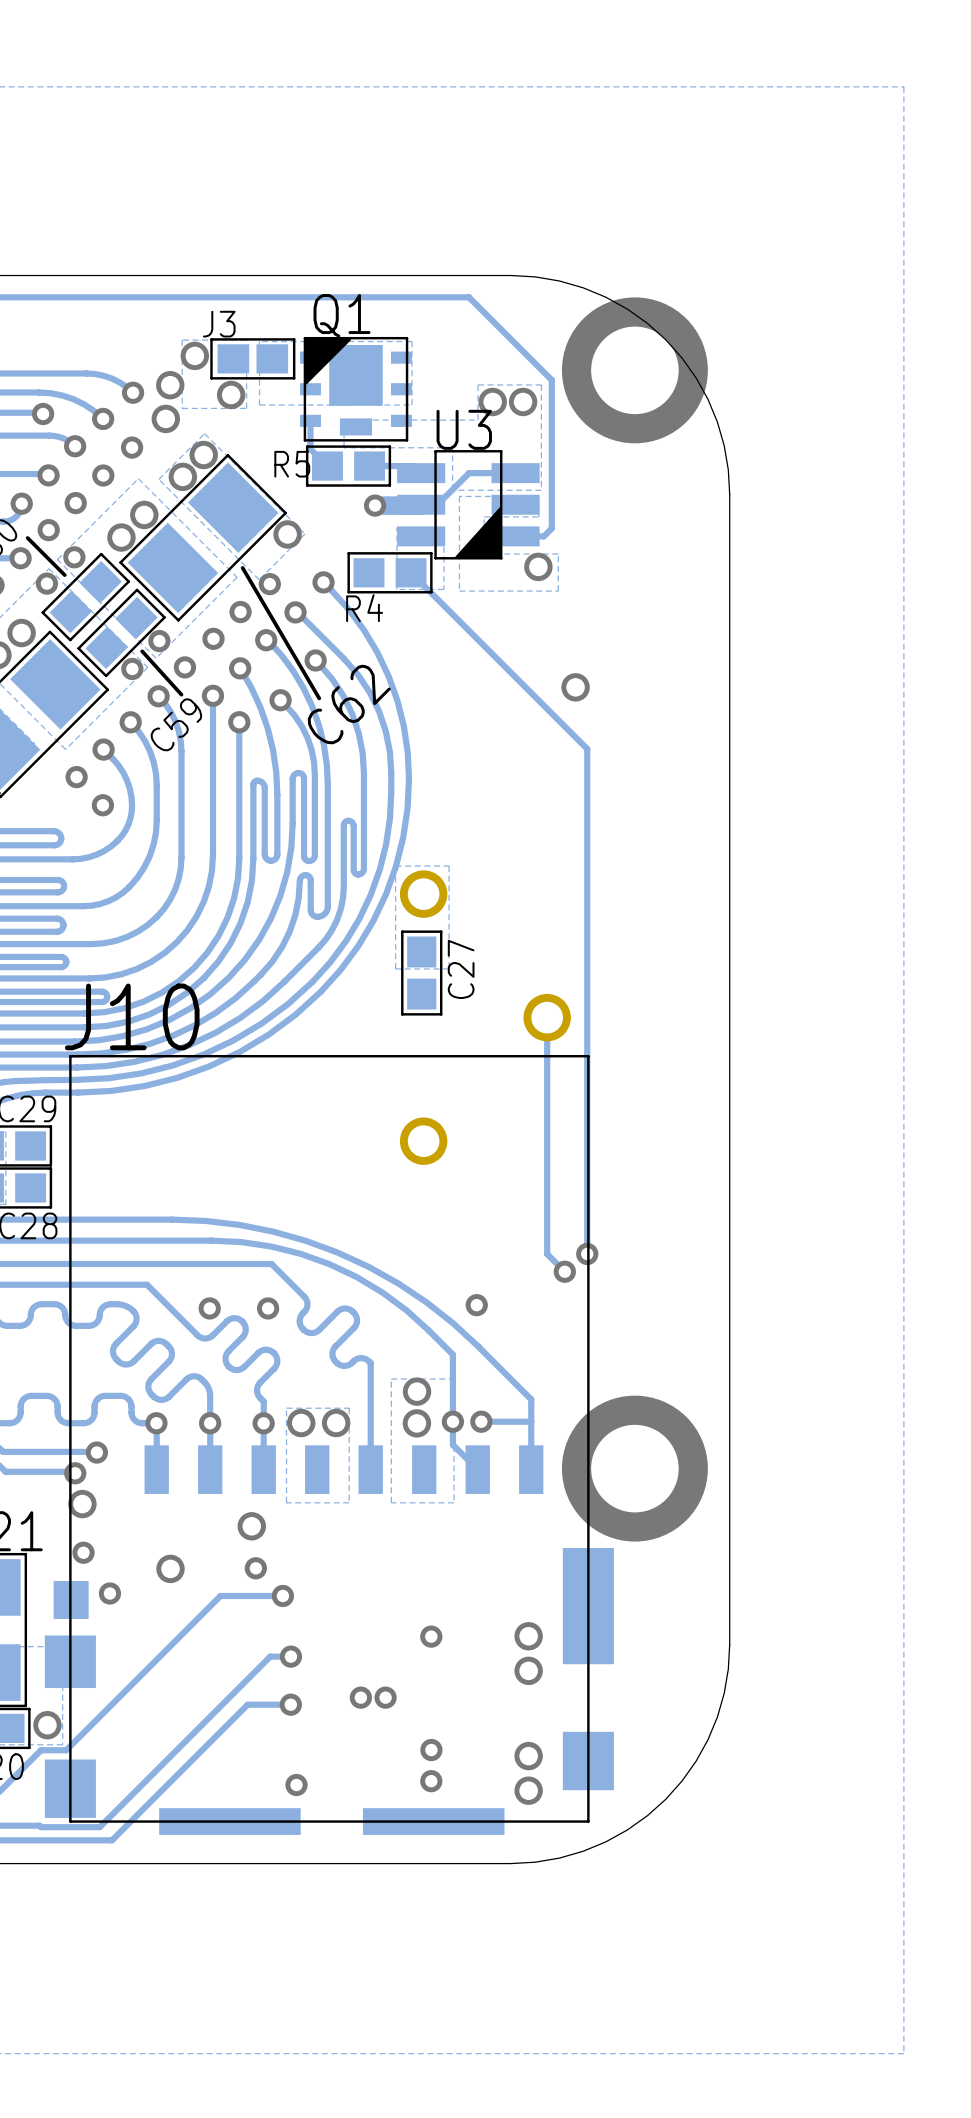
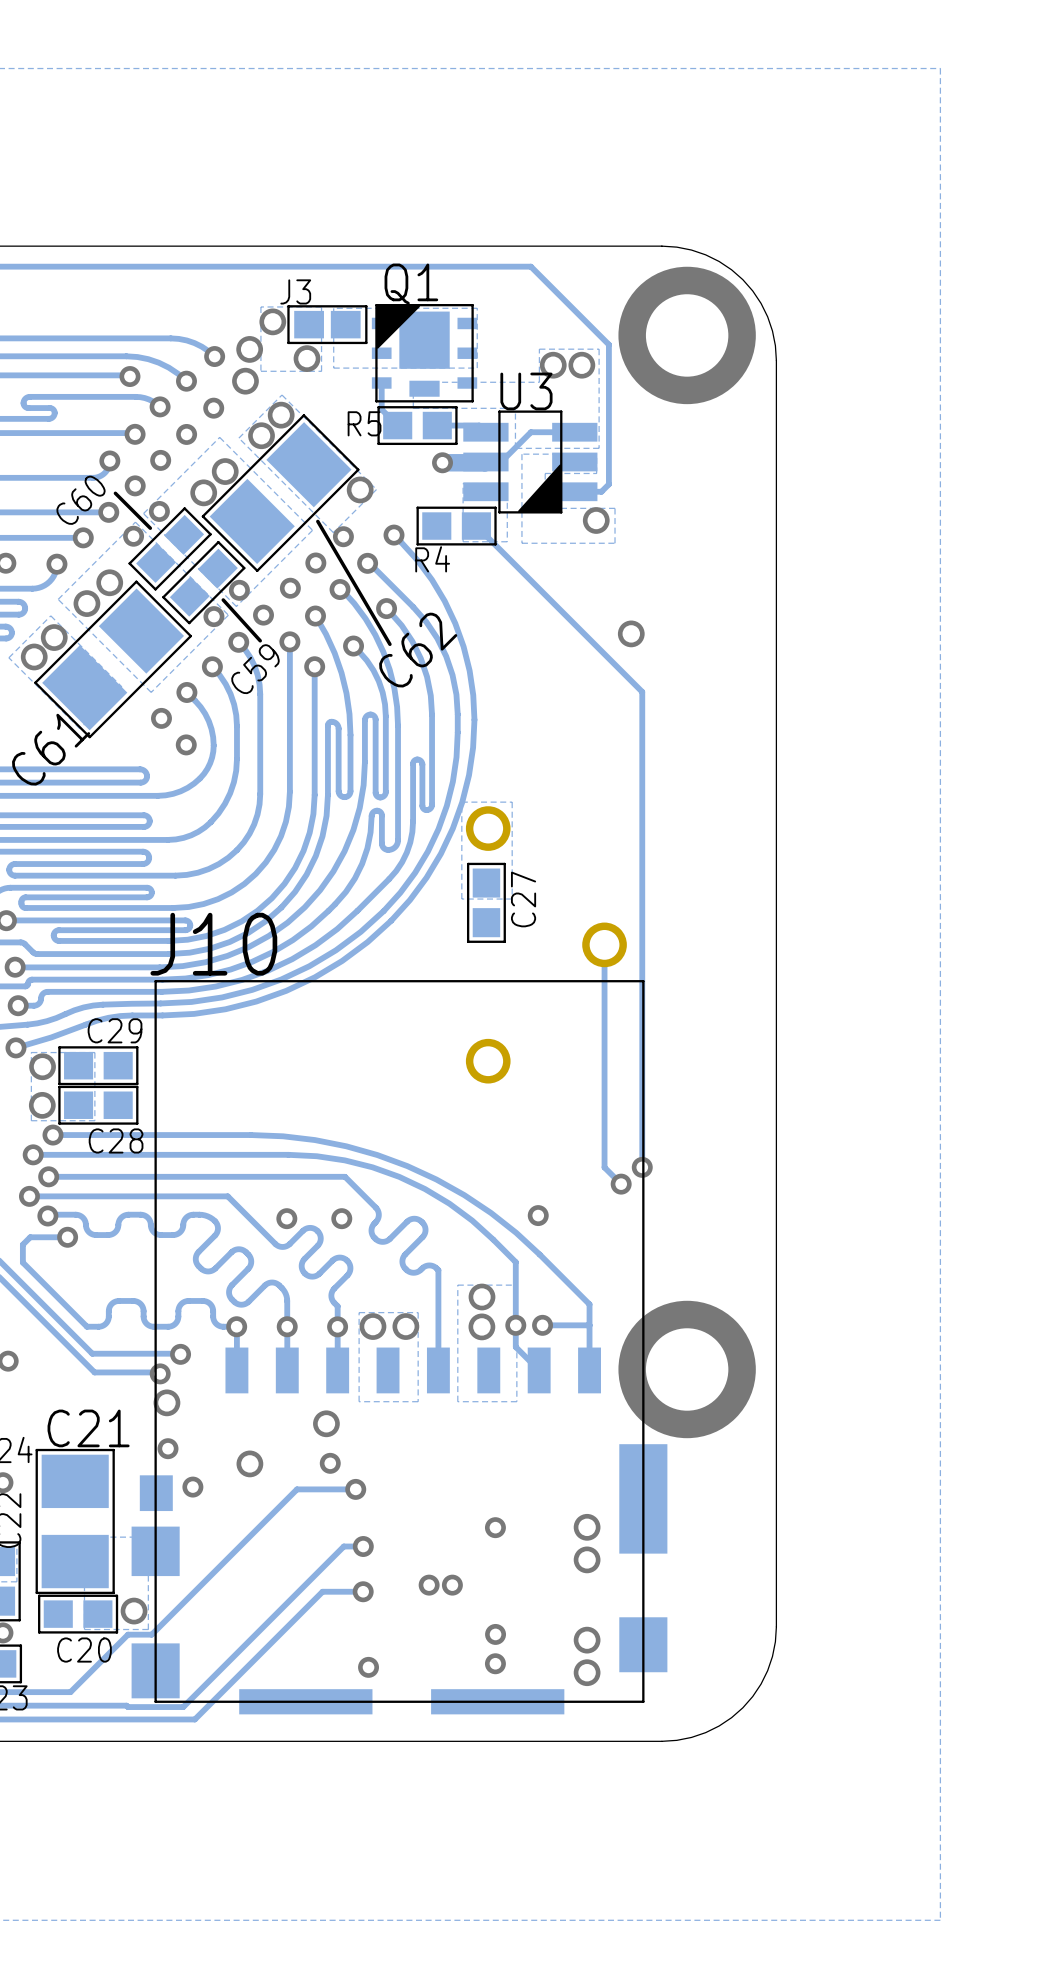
board edge: (510, 275) (559, 281) (605, 297) (627, 309) (665, 339) (696, 377) (708, 399) (724, 445) (729, 494) -> (570, 246) (676, 247) (705, 254) (719, 261) (742, 279) (761, 303) (767, 316) (775, 345) (776, 452)
board edge: (729, 1644) (724, 1693) (708, 1739) (696, 1761) (665, 1799) (627, 1830) (605, 1841) (559, 1858) (510, 1863) -> (776, 1535) (775, 1641) (767, 1670) (761, 1684) (742, 1707) (719, 1726) (705, 1732) (676, 1740) (570, 1741)

